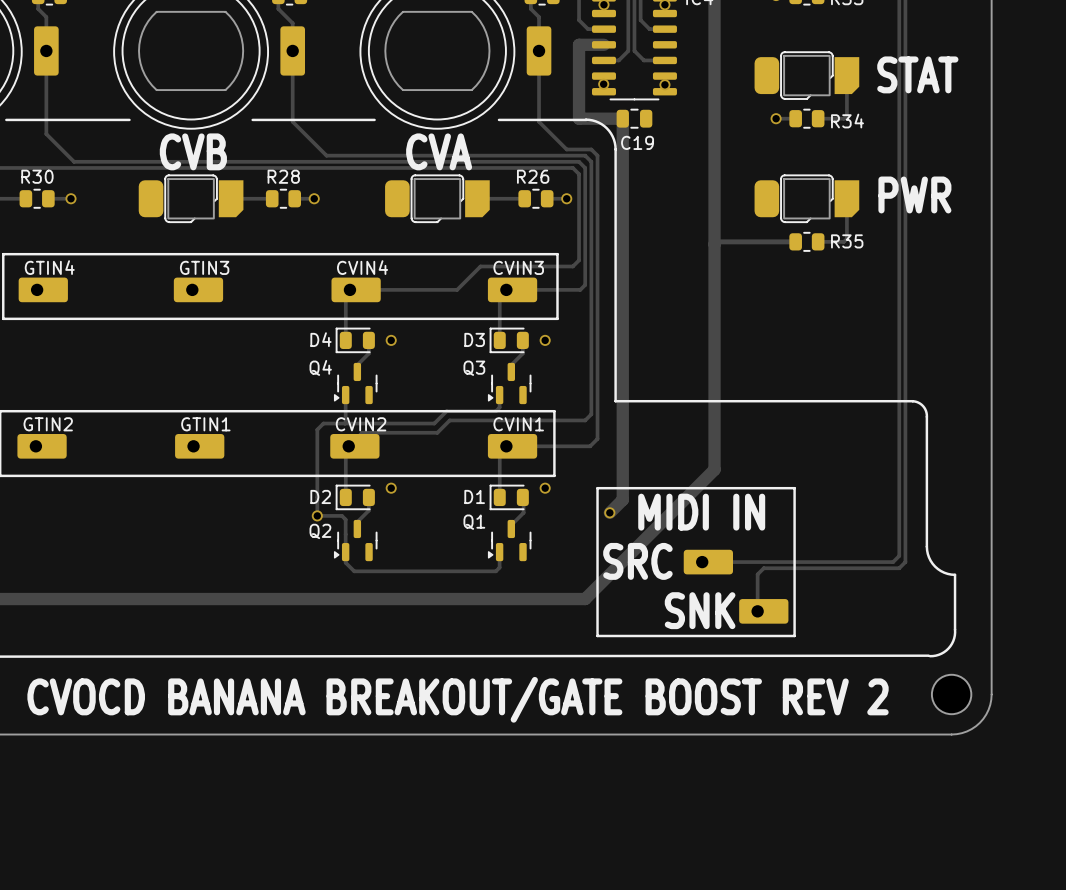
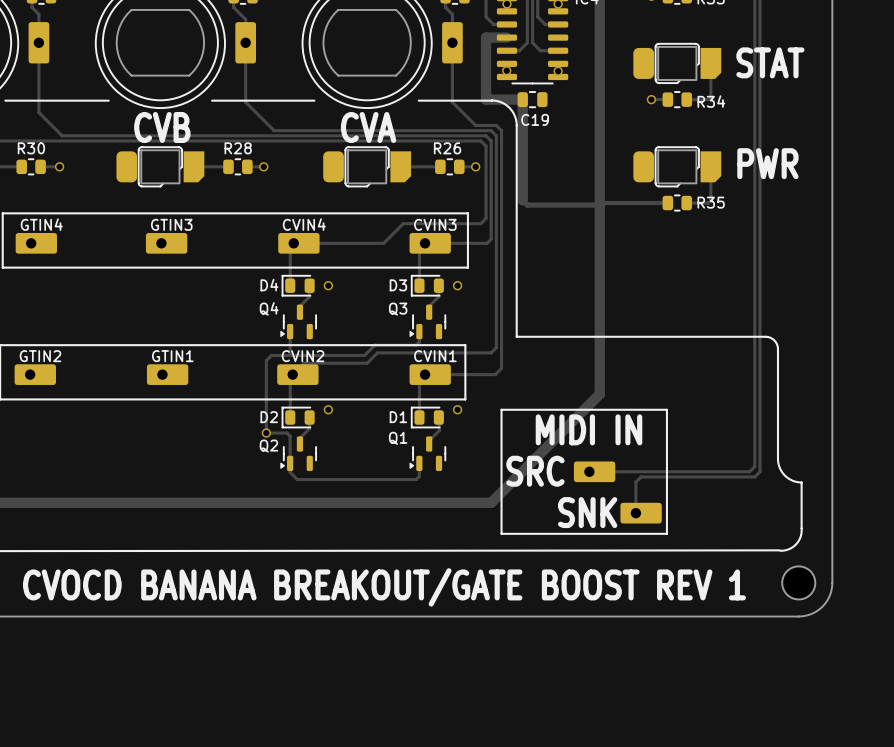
track: (622, 238) (622, 499) (609, 512) -> (522, 200) (527, 205) (599, 205)
via: (609, 512) -> none
text: CVOCD BANANA BREAKOUT/GATE BOOST REV 2 (458, 699) -> CVOCD BANANA BREAKOUT/GATE BOOST REV 1 (384, 587)

